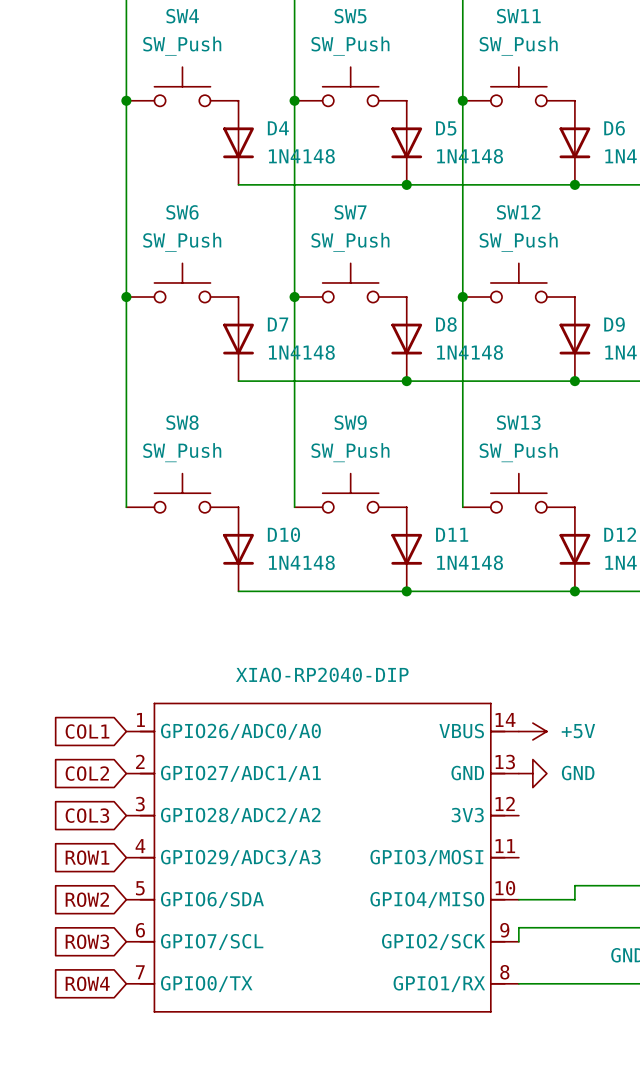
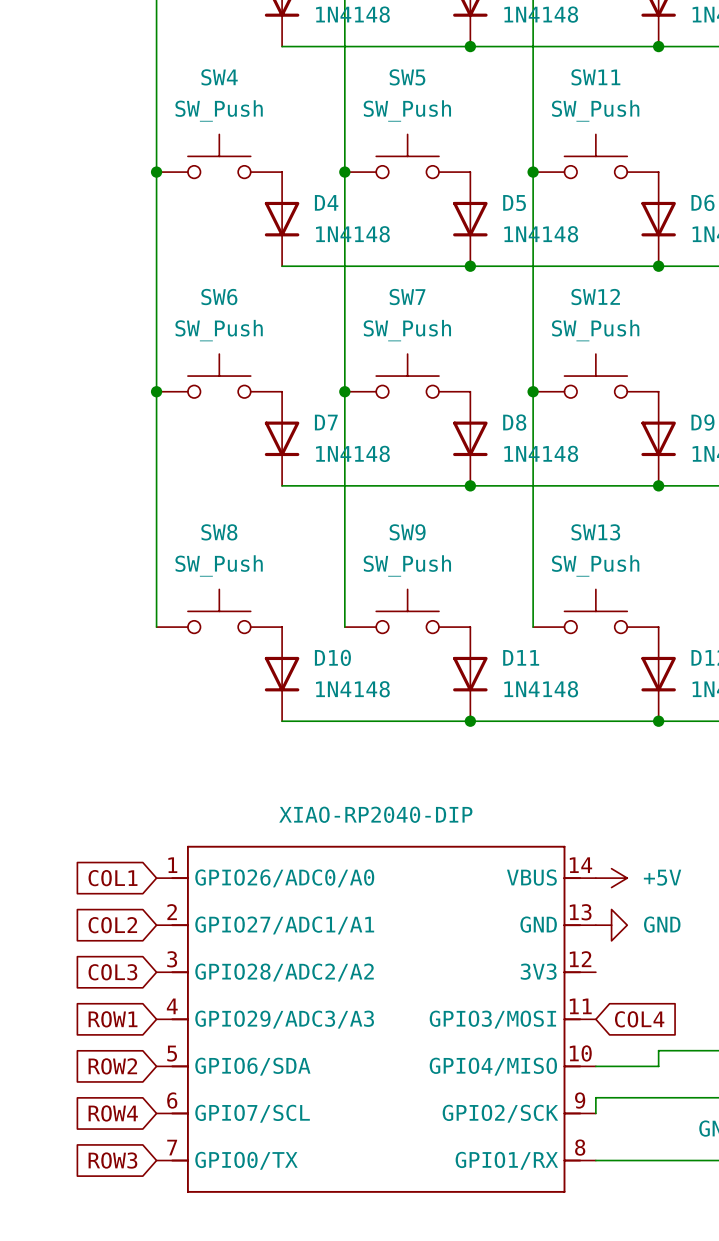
global label: none -> COL4 (639, 1019)
global label: ROW3 (87, 941) -> ROW4 (113, 1113)
global label: ROW4 (87, 983) -> ROW3 (112, 1160)

